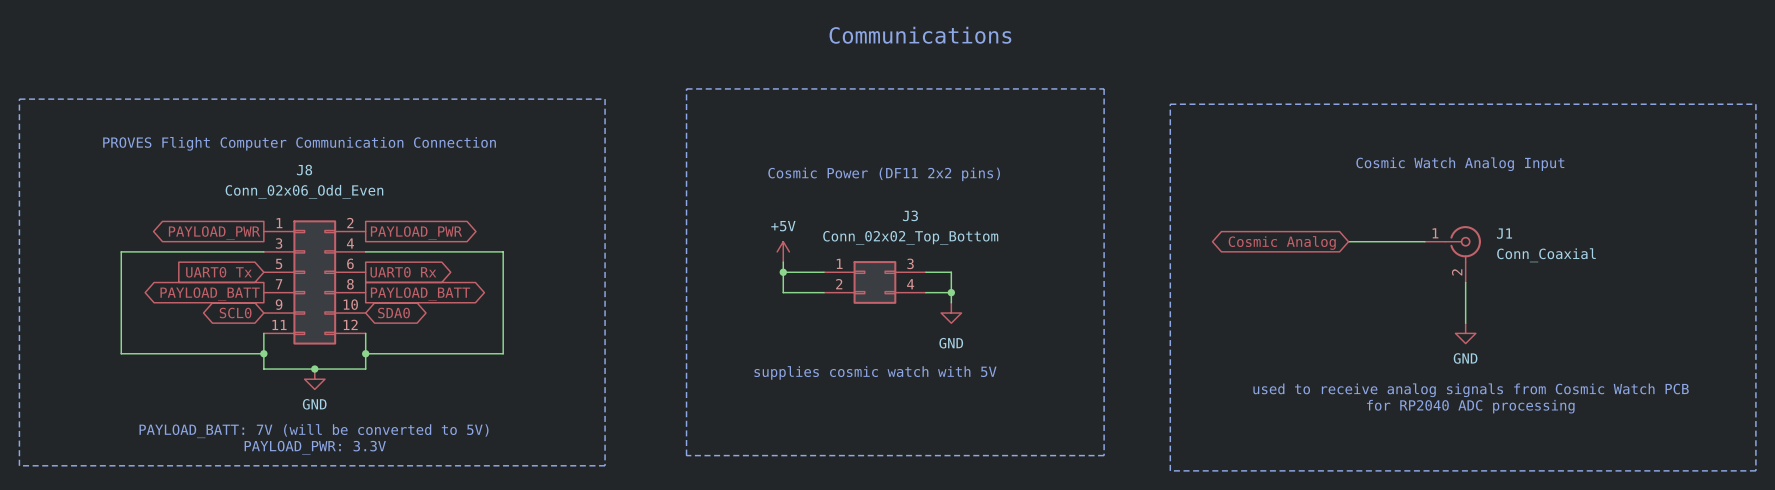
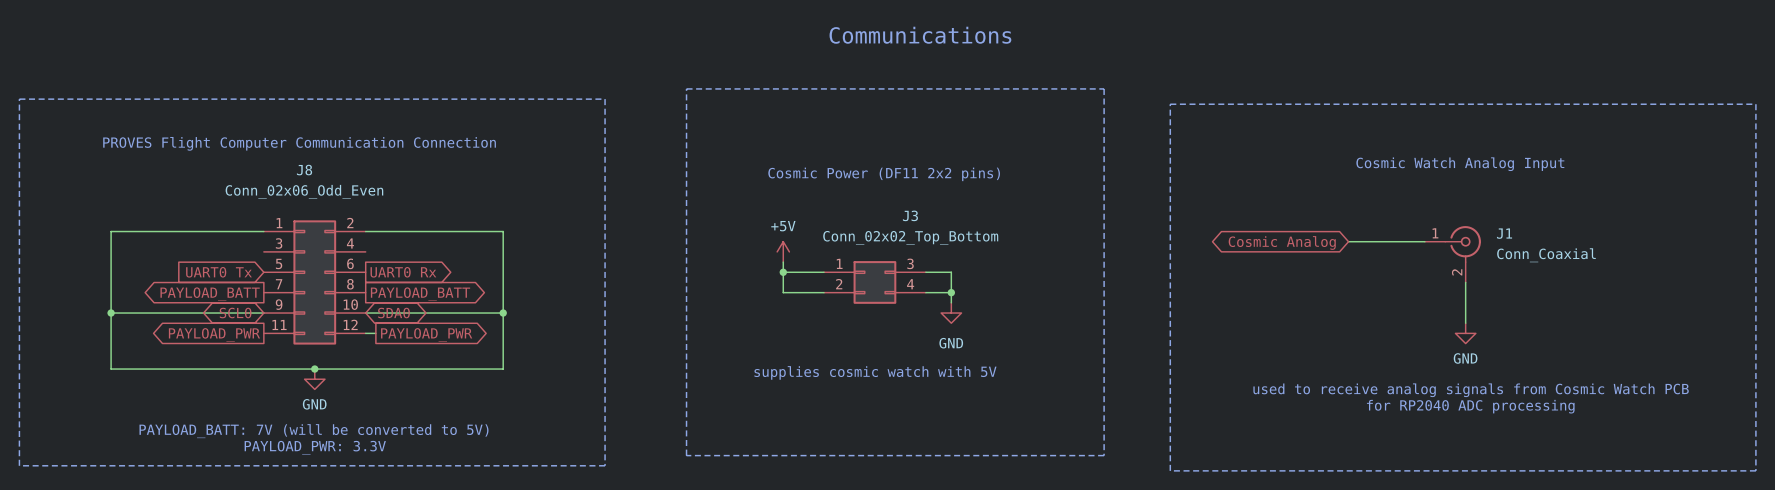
global label: PAYLOAD_PWR (214, 233) -> none
global label: PAYLOAD_PWR (416, 233) -> none
wire: (263, 251) (121, 251) (121, 353) (263, 353) -> none
wire: (365, 251) (503, 251) -> (365, 231) (503, 231) (503, 251)
wire: none -> (111, 313) (263, 313)
junction: none -> (111, 313)
wire: none -> (365, 313) (503, 313)
junction: none -> (503, 313)
wire: (263, 333) (263, 369) -> (263, 231) (111, 231) (111, 369) (263, 369)
wire: (365, 333) (365, 369) -> (365, 333) (375, 333)
global label: none -> PAYLOAD_PWR (214, 334)
global label: none -> PAYLOAD_PWR (426, 334)
junction: (263, 353) -> none
wire: (365, 353) (503, 353) -> (365, 369) (503, 369) (503, 353)
junction: (365, 353) -> none

